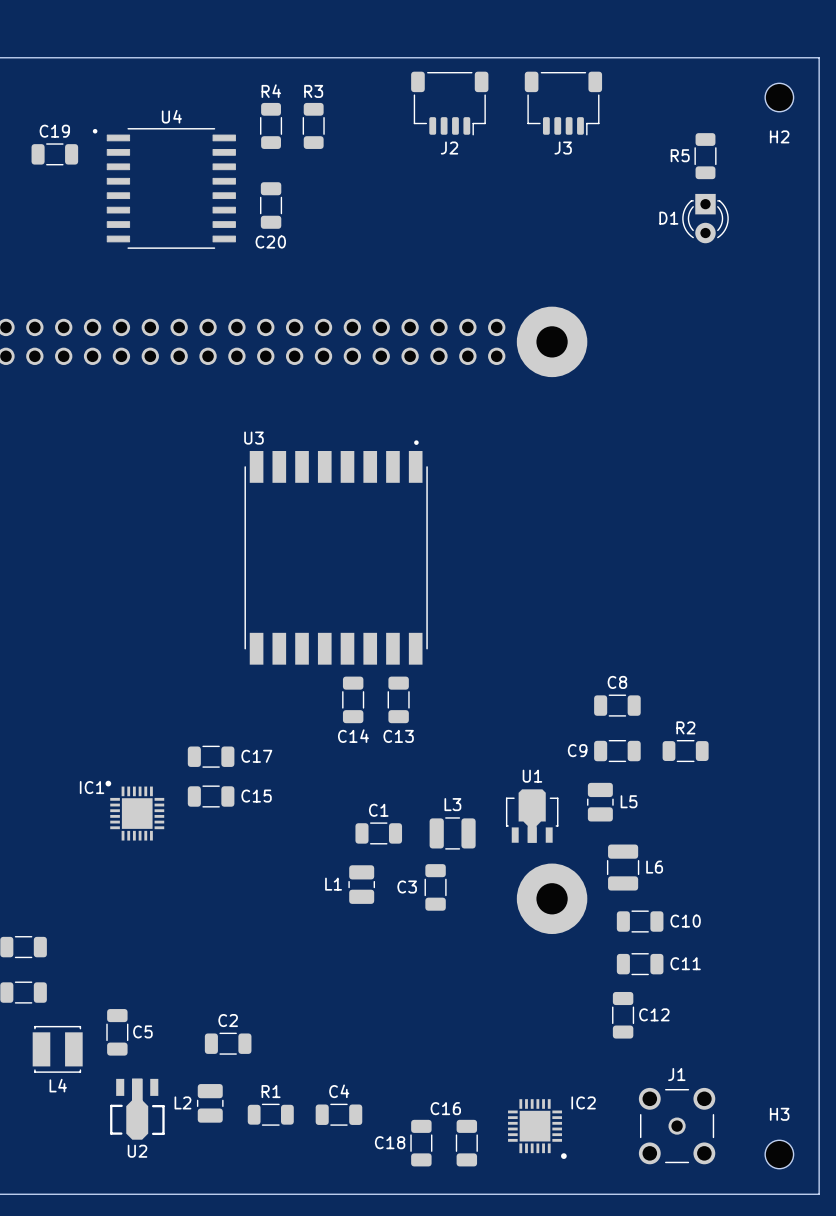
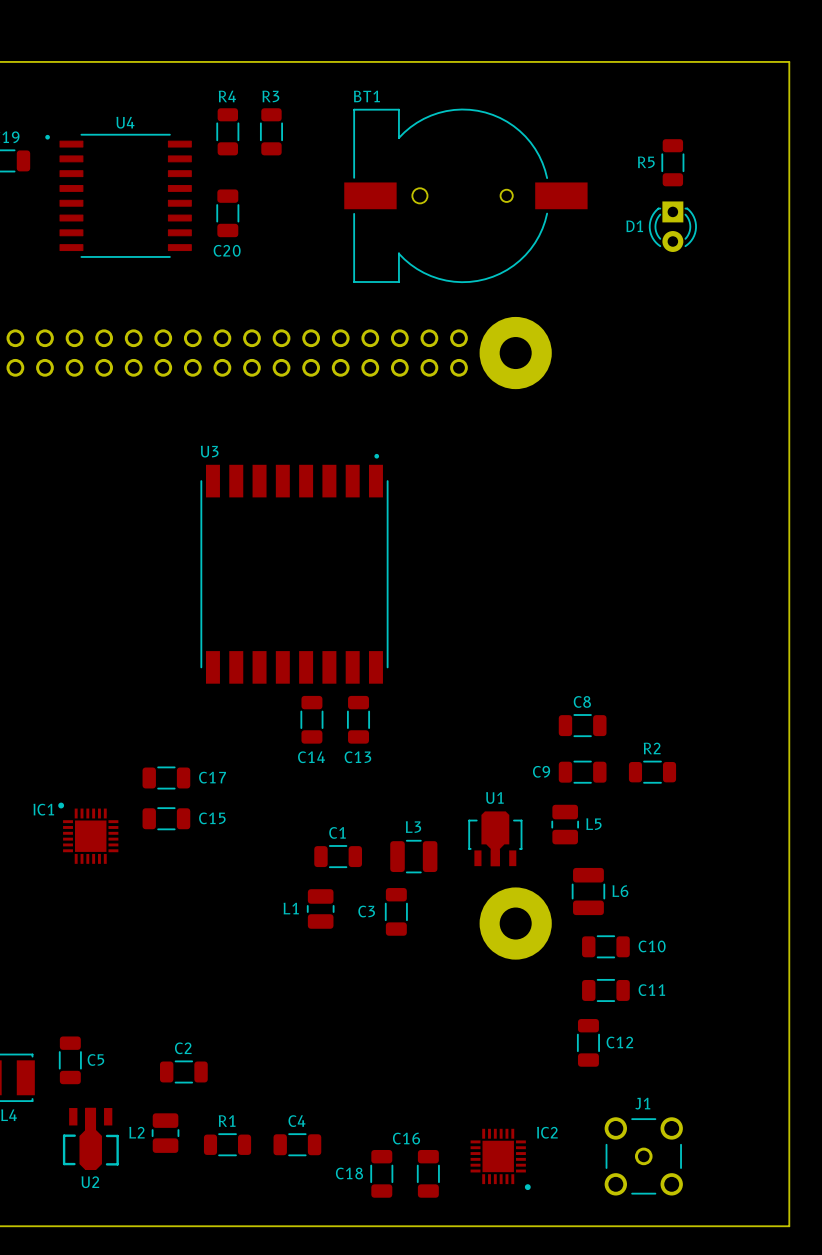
H2: (779, 97) -> none
J2: (449, 103) -> none
J3: (563, 103) -> none
BT1: none -> (465, 195)
H3: (779, 1154) -> none

